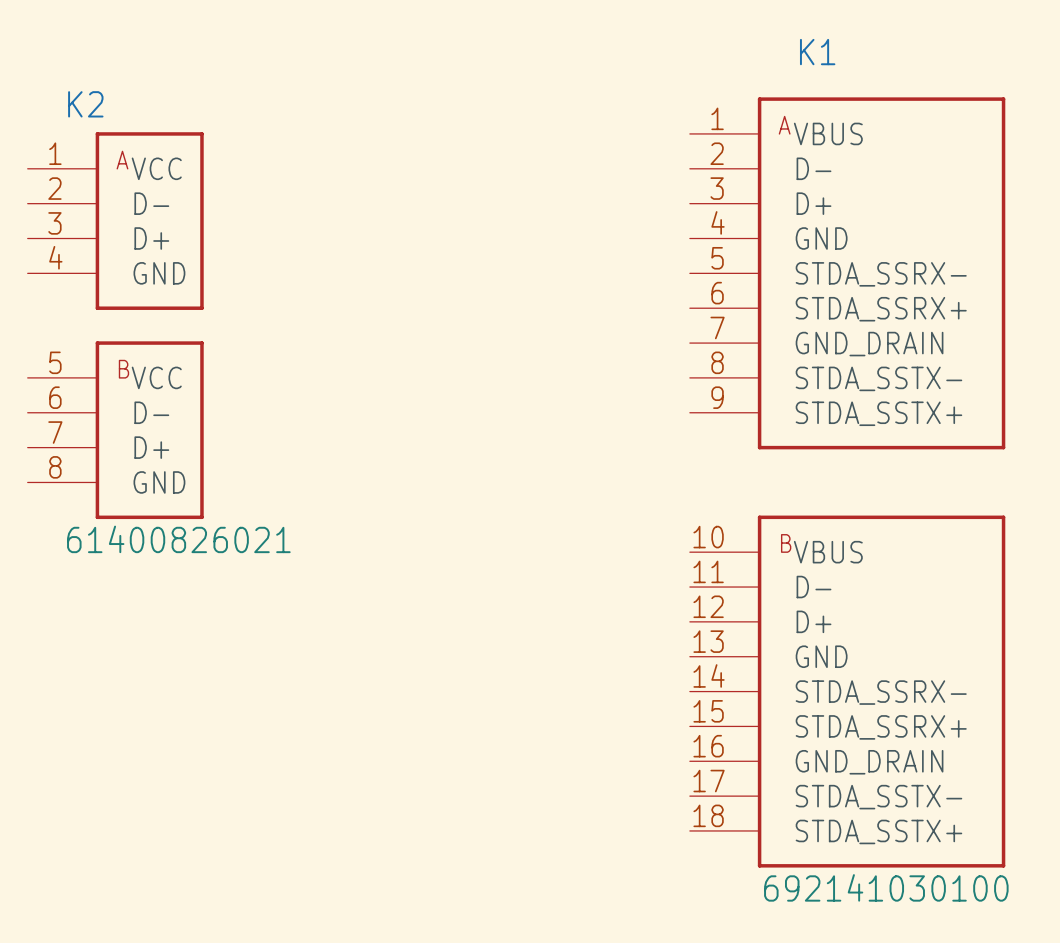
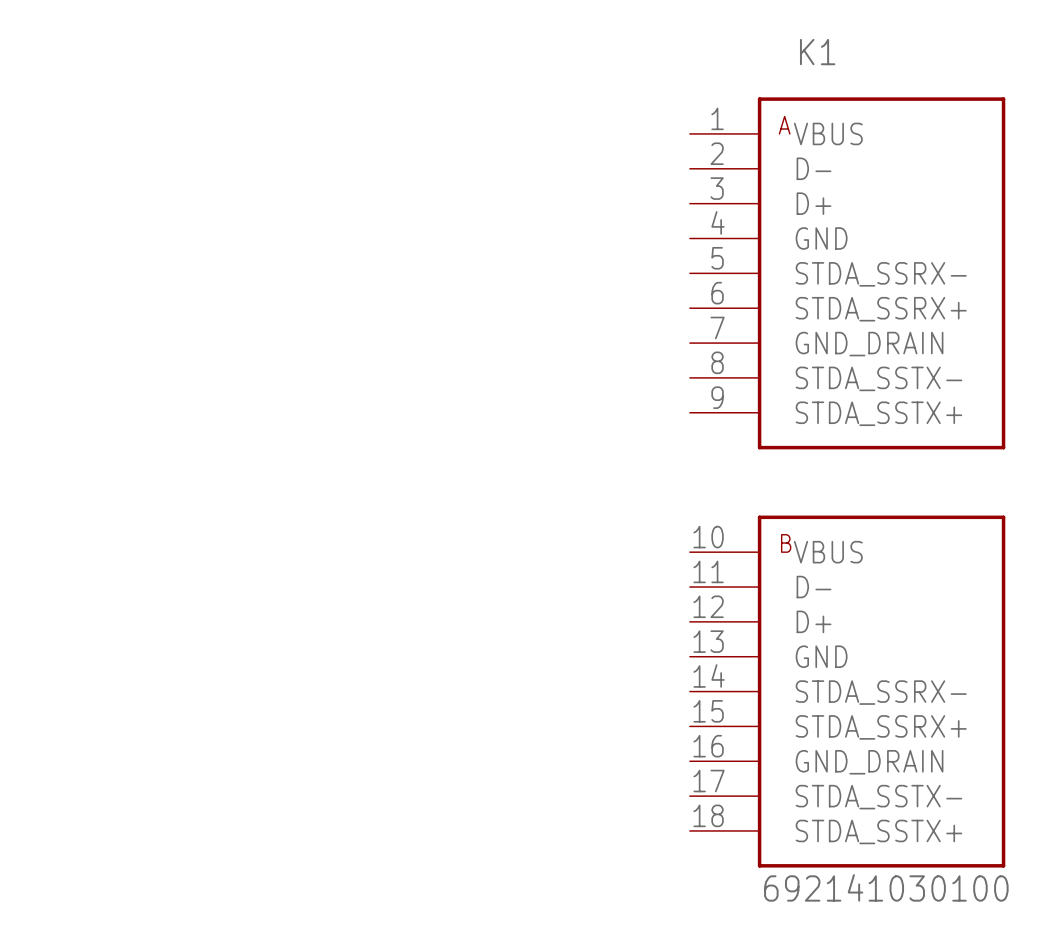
K2: 61400826021 (115, 325) -> none

